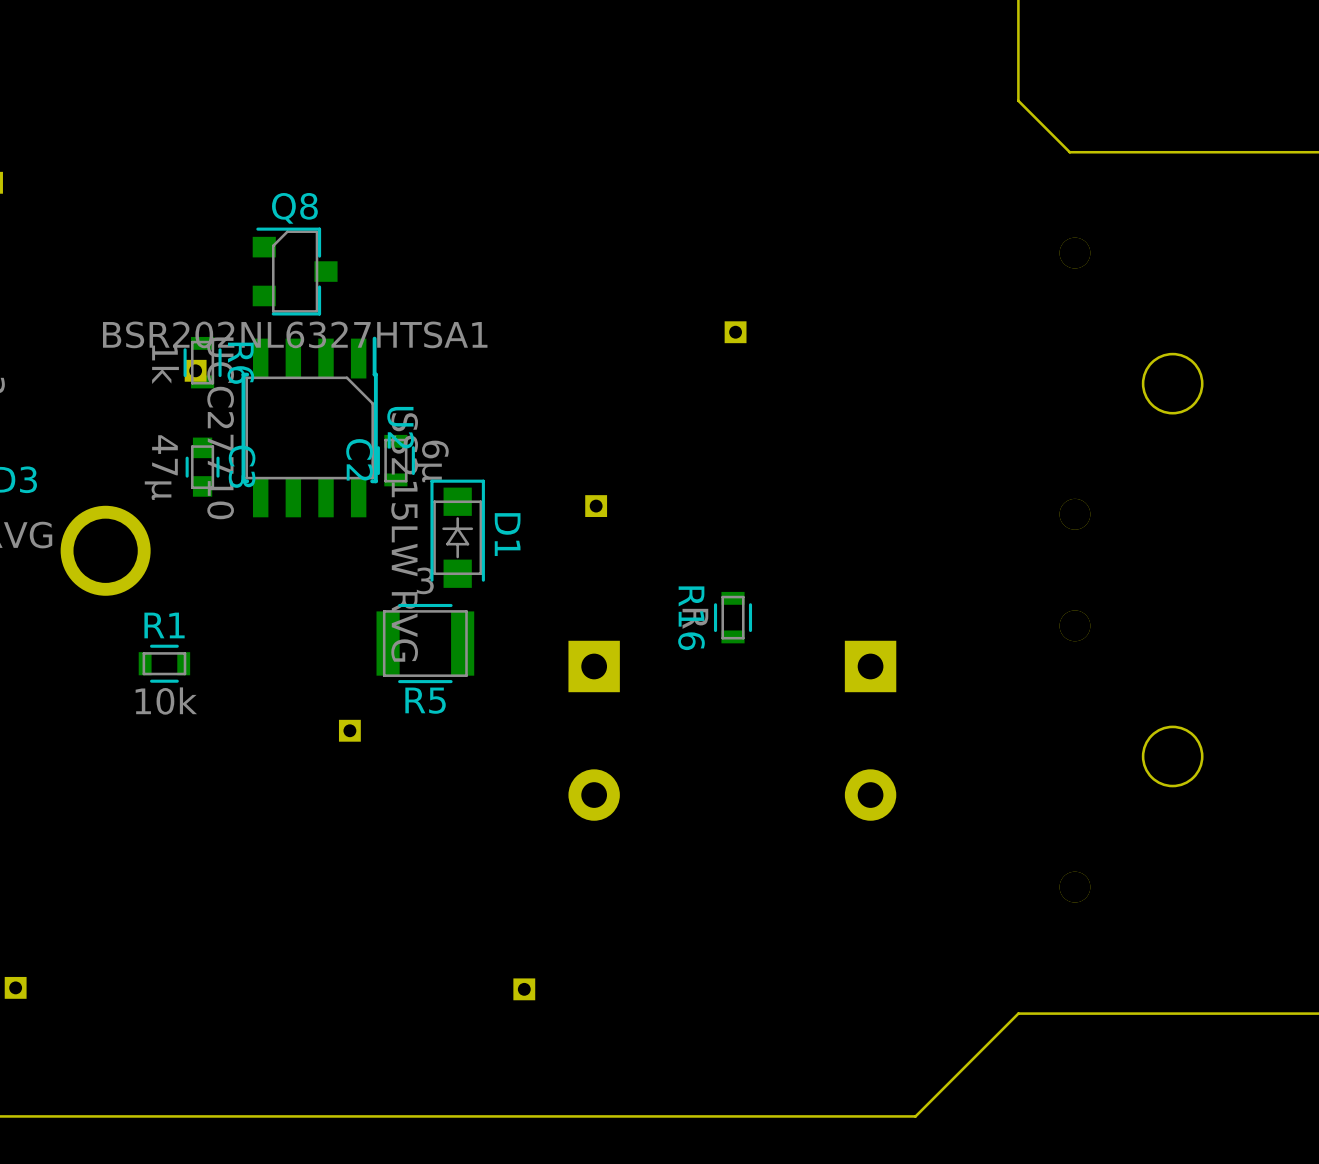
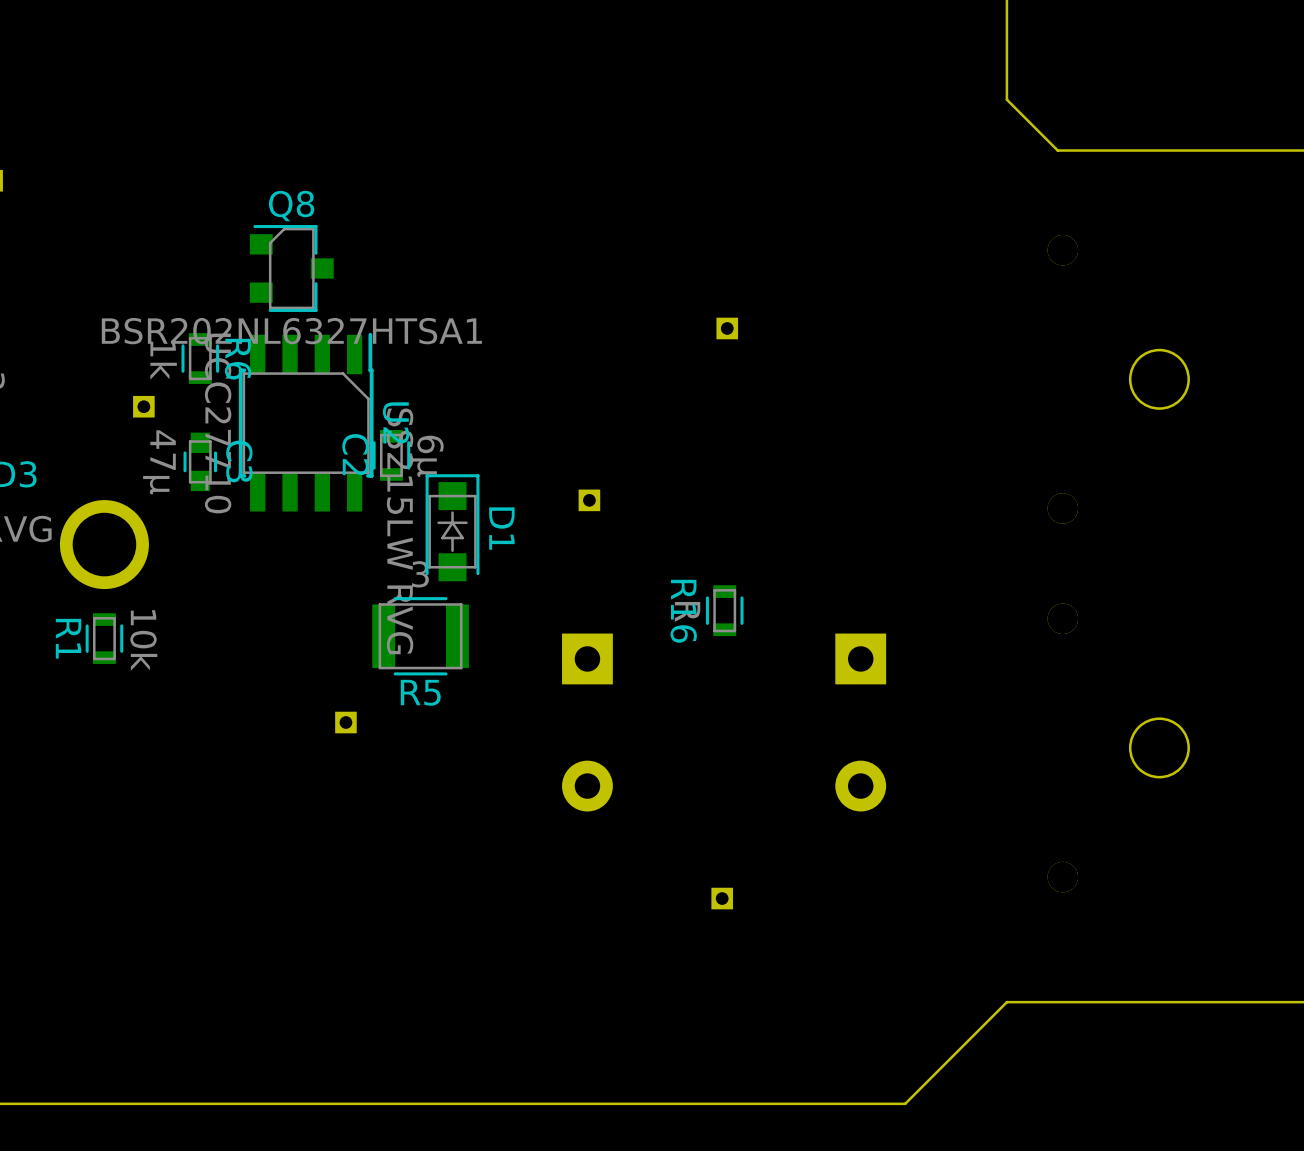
part position: (195, 370) -> (143, 406)
R1 name position: R1 (164, 625) -> R1 (68, 638)
R1 rotation: 0° (164, 663) -> 90° clockwise (104, 638)
R1 position: (164, 663) -> (104, 638)
R1 value position: 10k (166, 701) -> 10k (143, 640)
part: (15, 987) -> none
part position: (524, 989) -> (722, 898)

